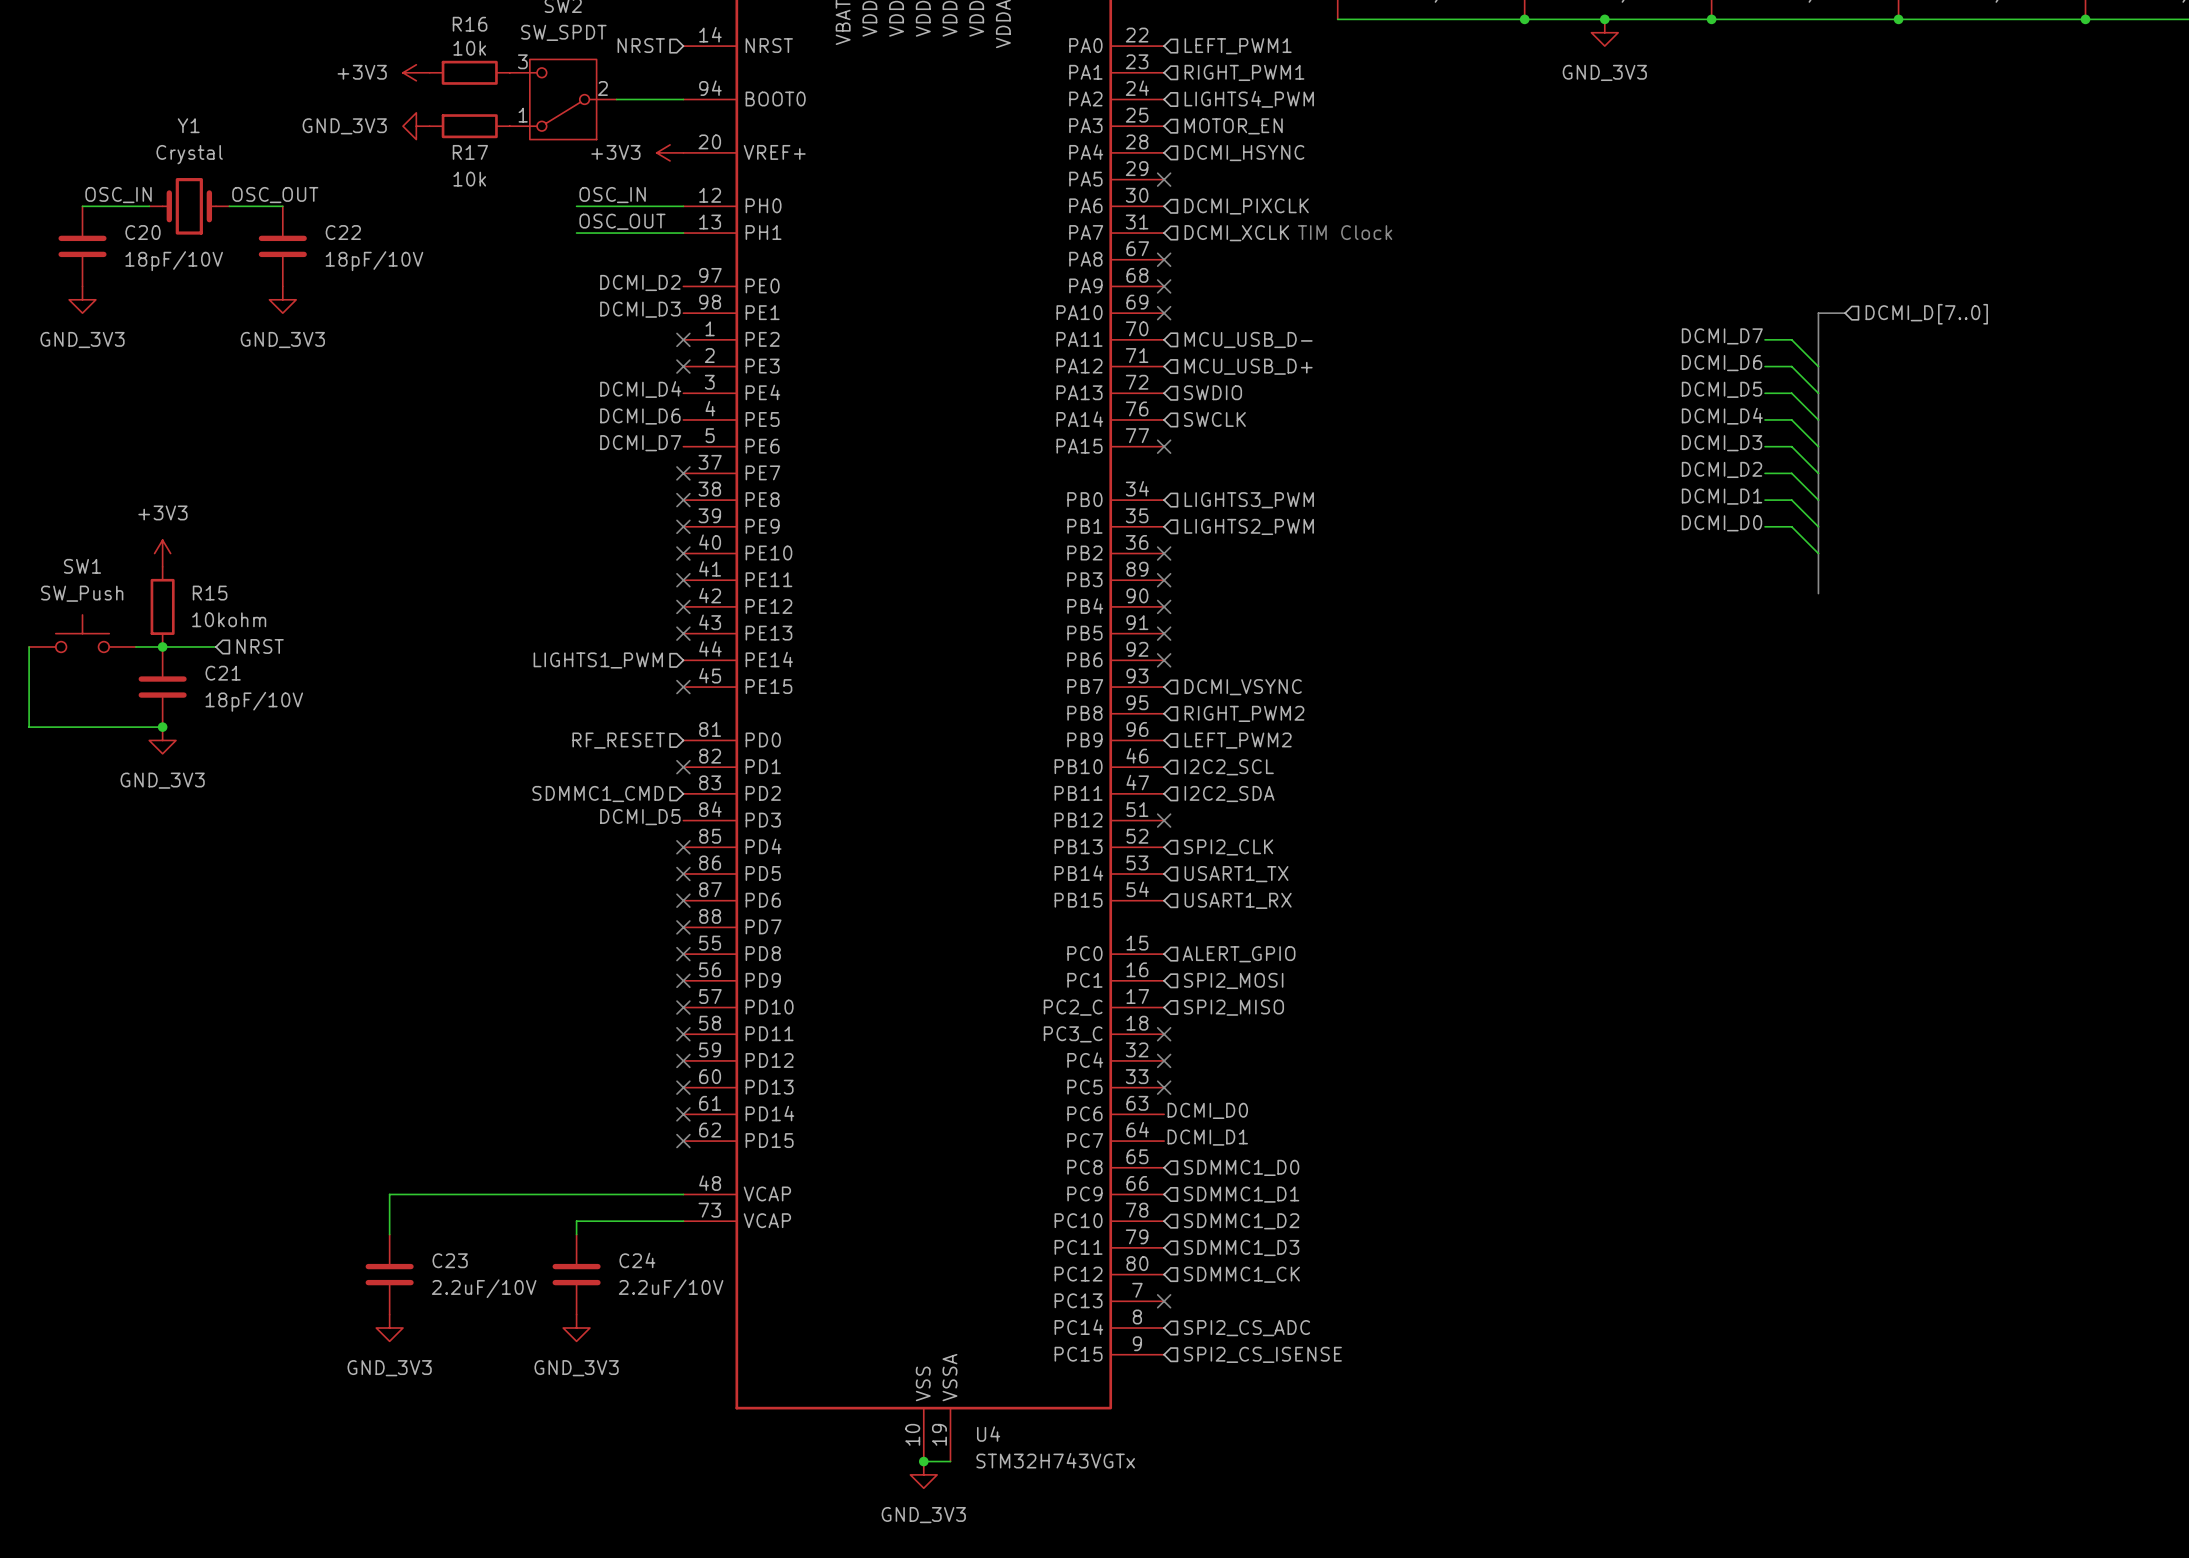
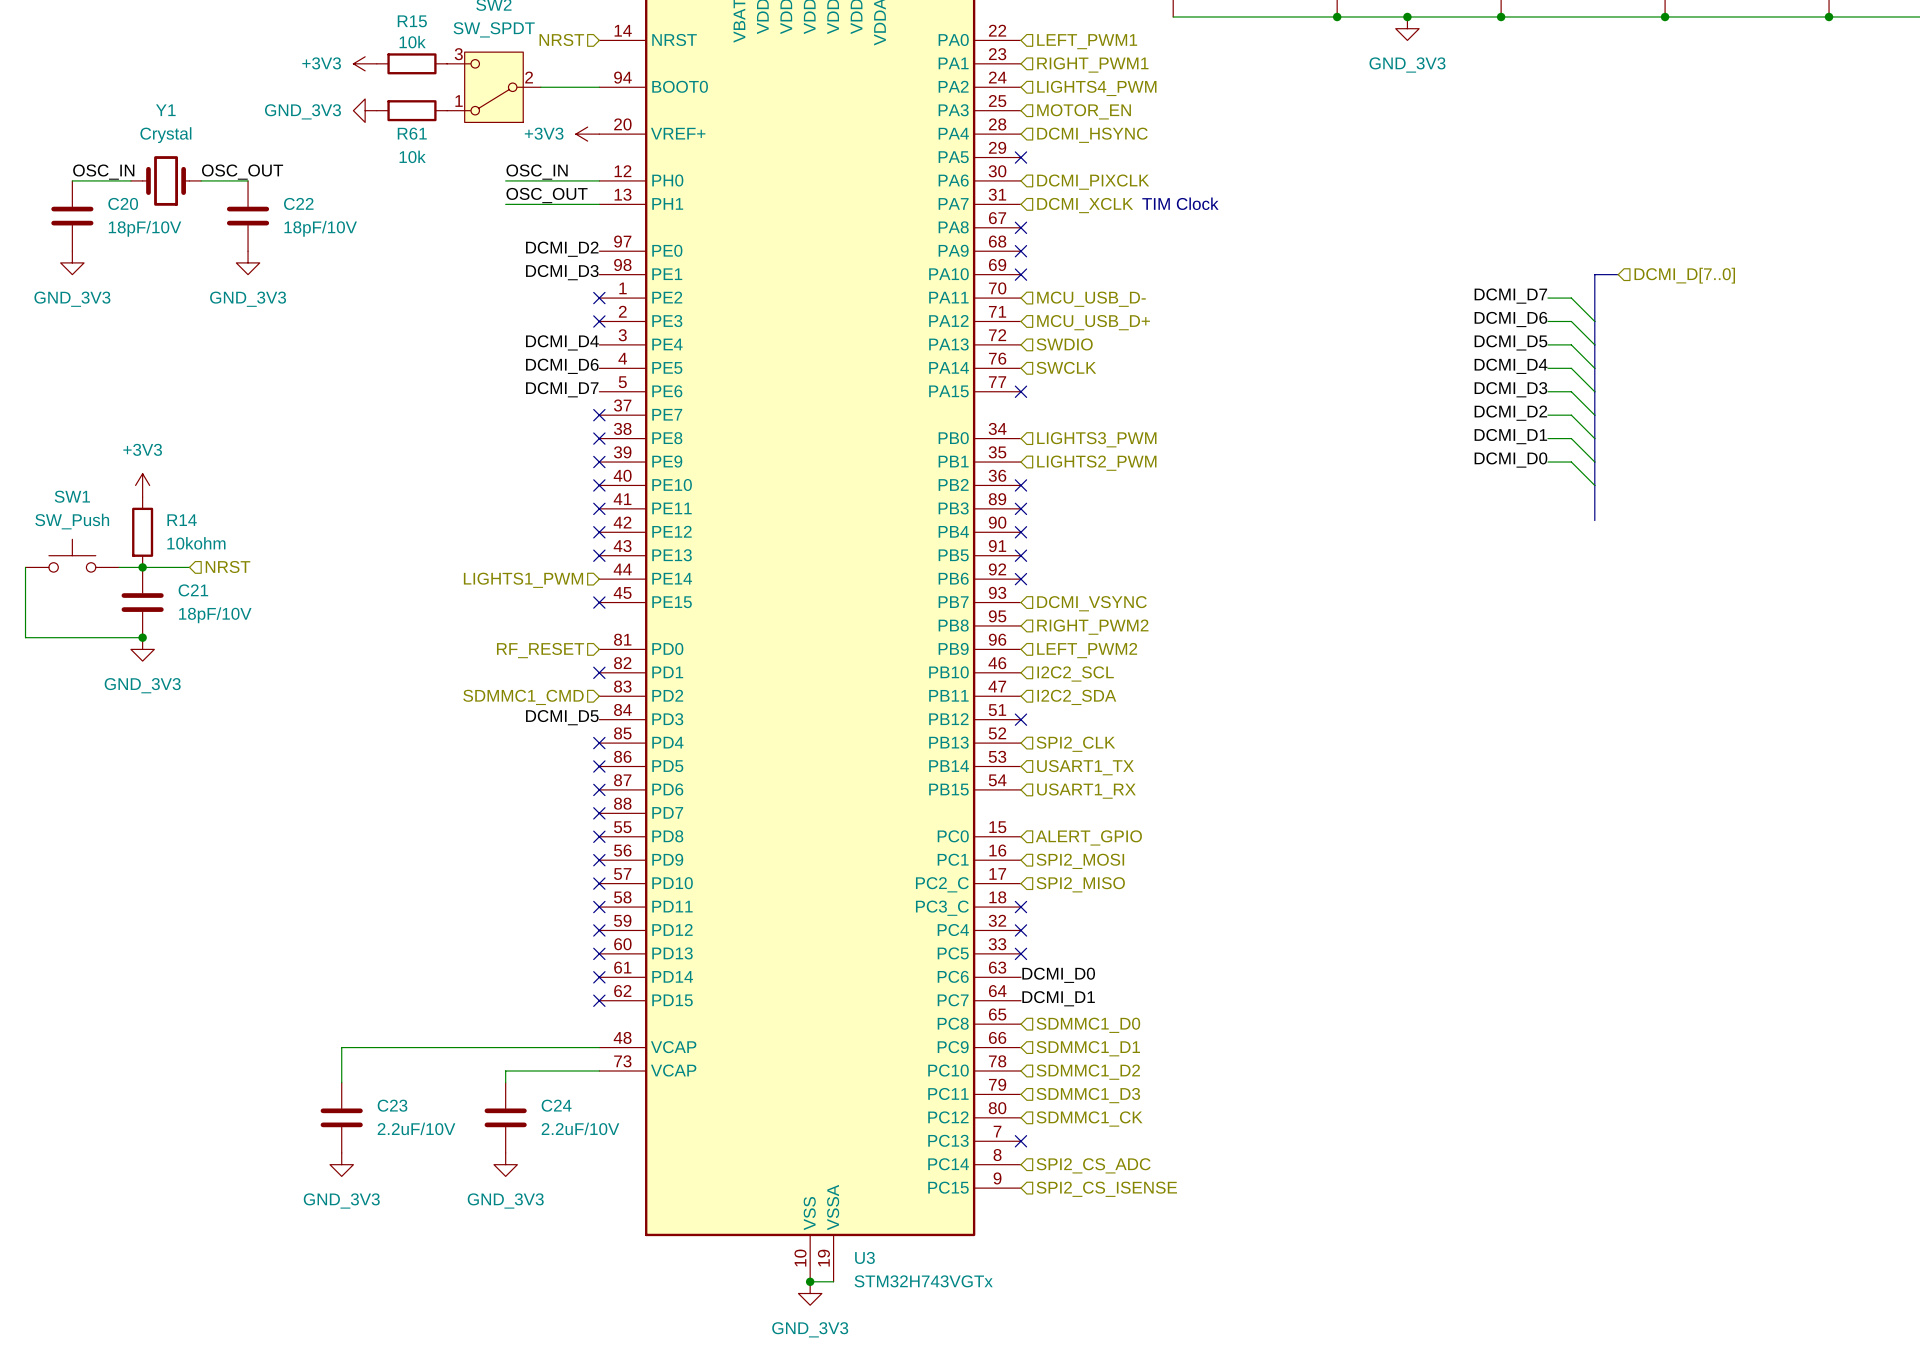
R16 name: R16 (470, 24) -> R15 (412, 21)
R17 name: R17 (470, 152) -> R61 (412, 133)
R15 name: R15 (210, 593) -> R14 (182, 520)
U4 name: U4 (988, 1434) -> U3 (864, 1257)

